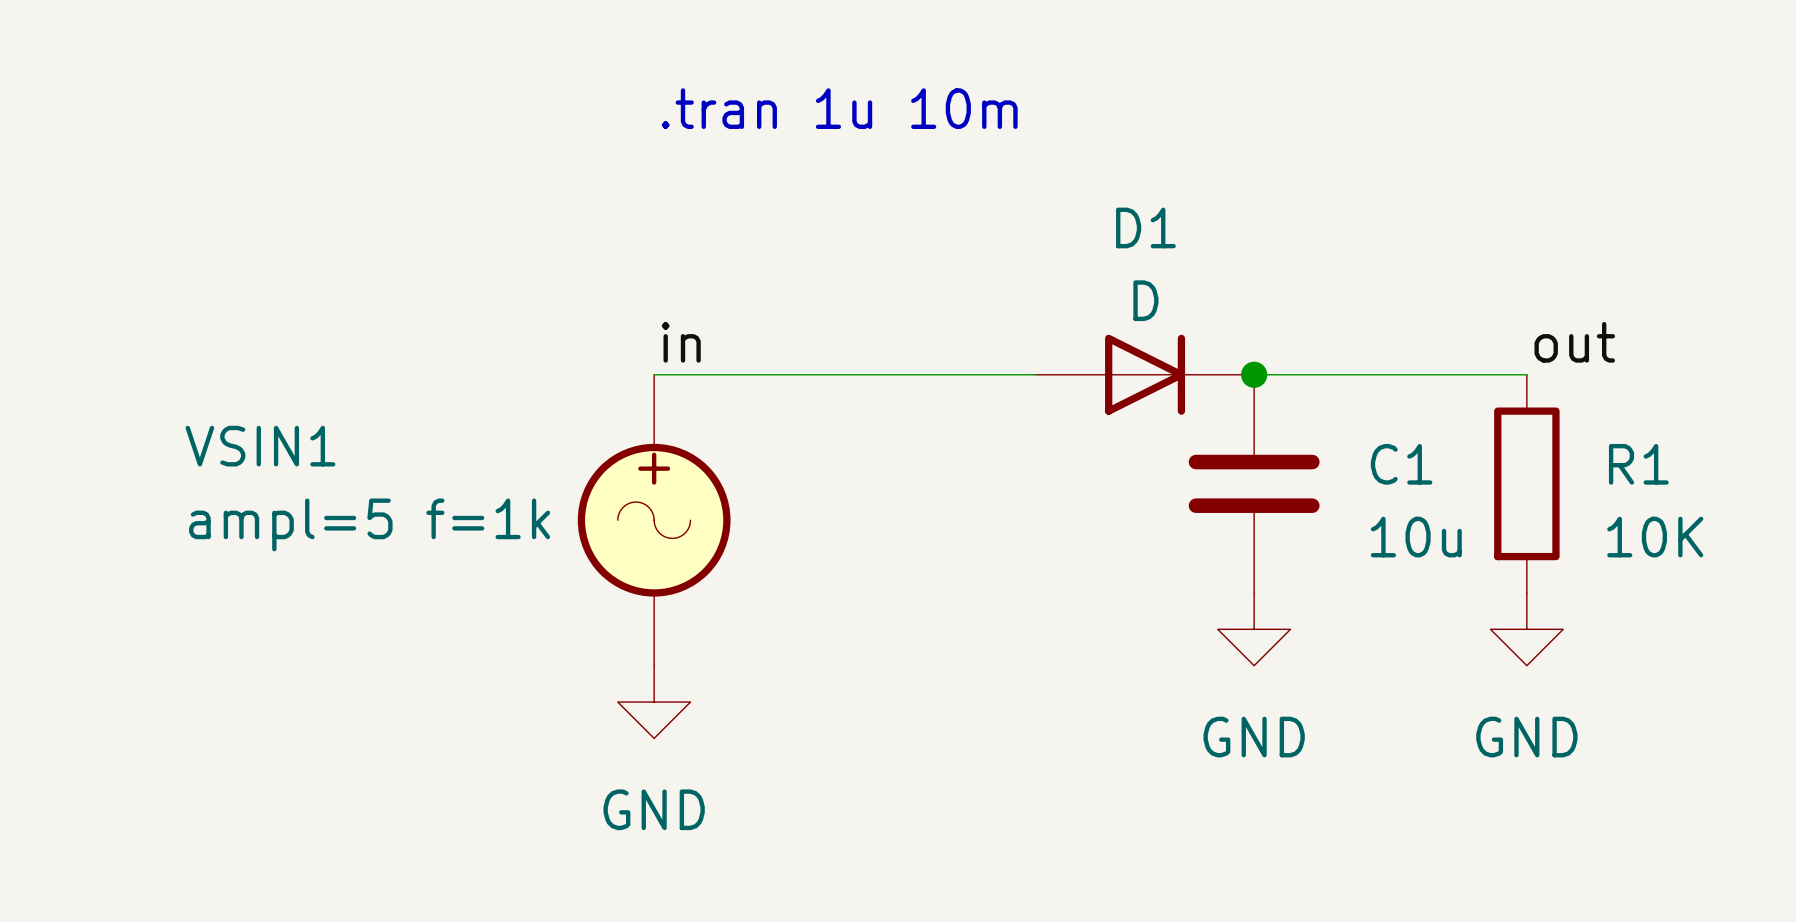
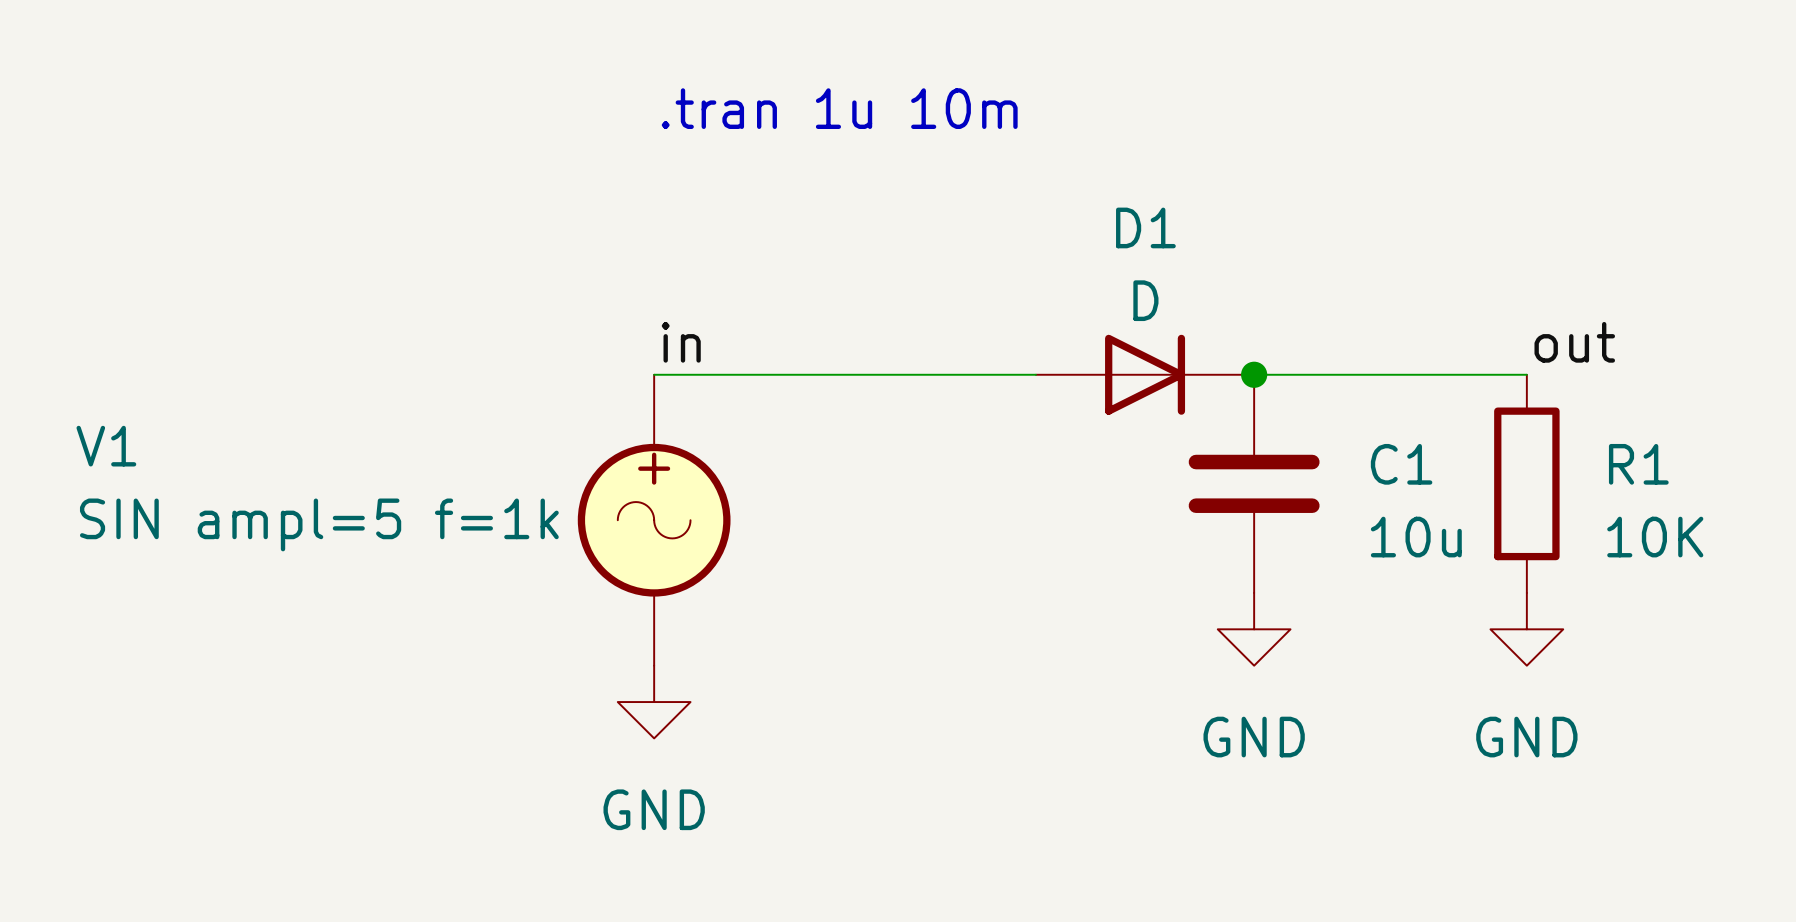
VSIN1 name: VSIN1 (260, 446) -> V1 (106, 446)
VSIN1 value: ampl=5 f=1k (369, 524) -> SIN ampl=5 f=1k (319, 524)

